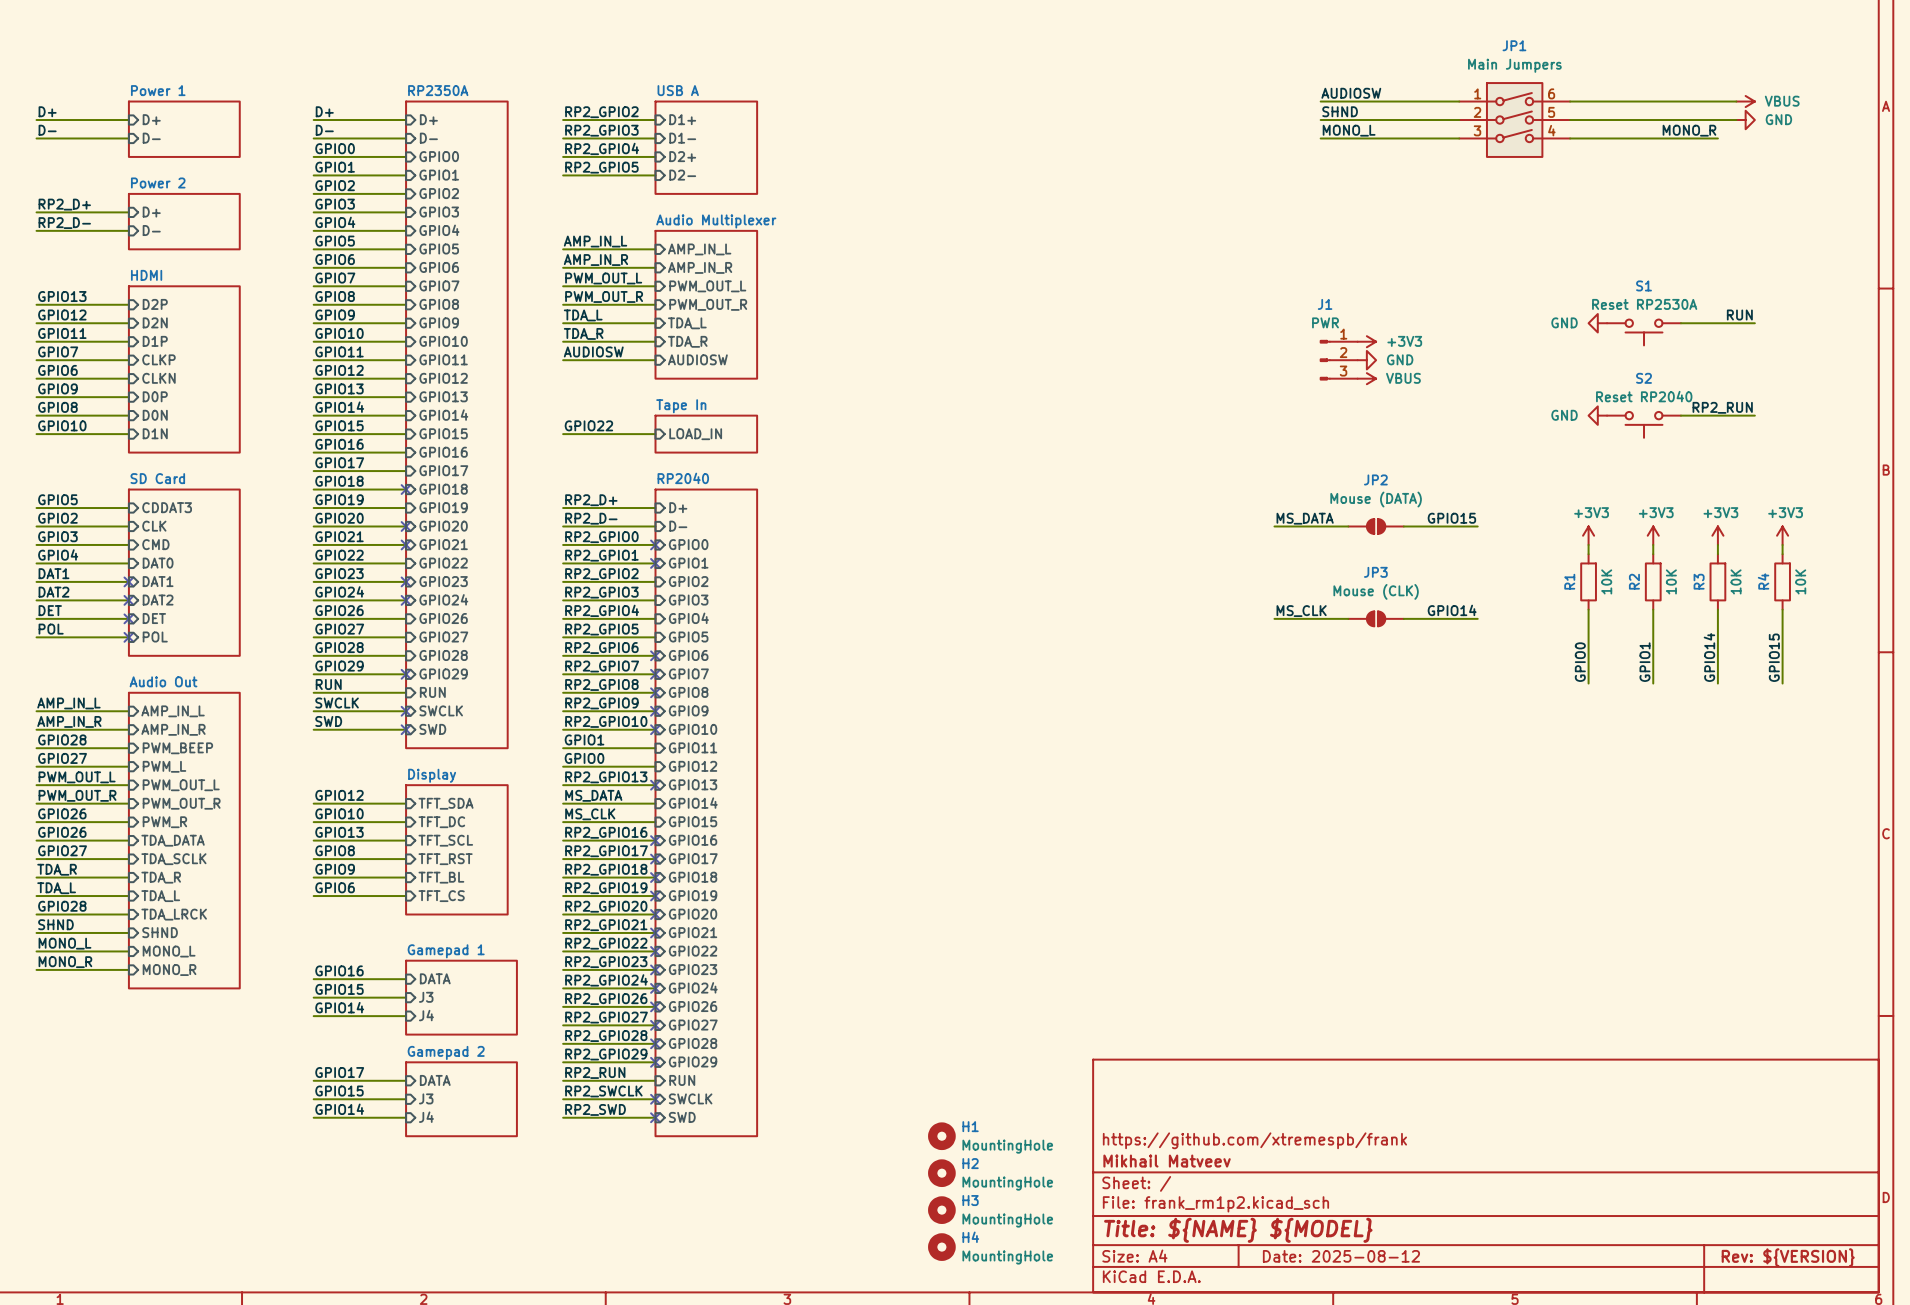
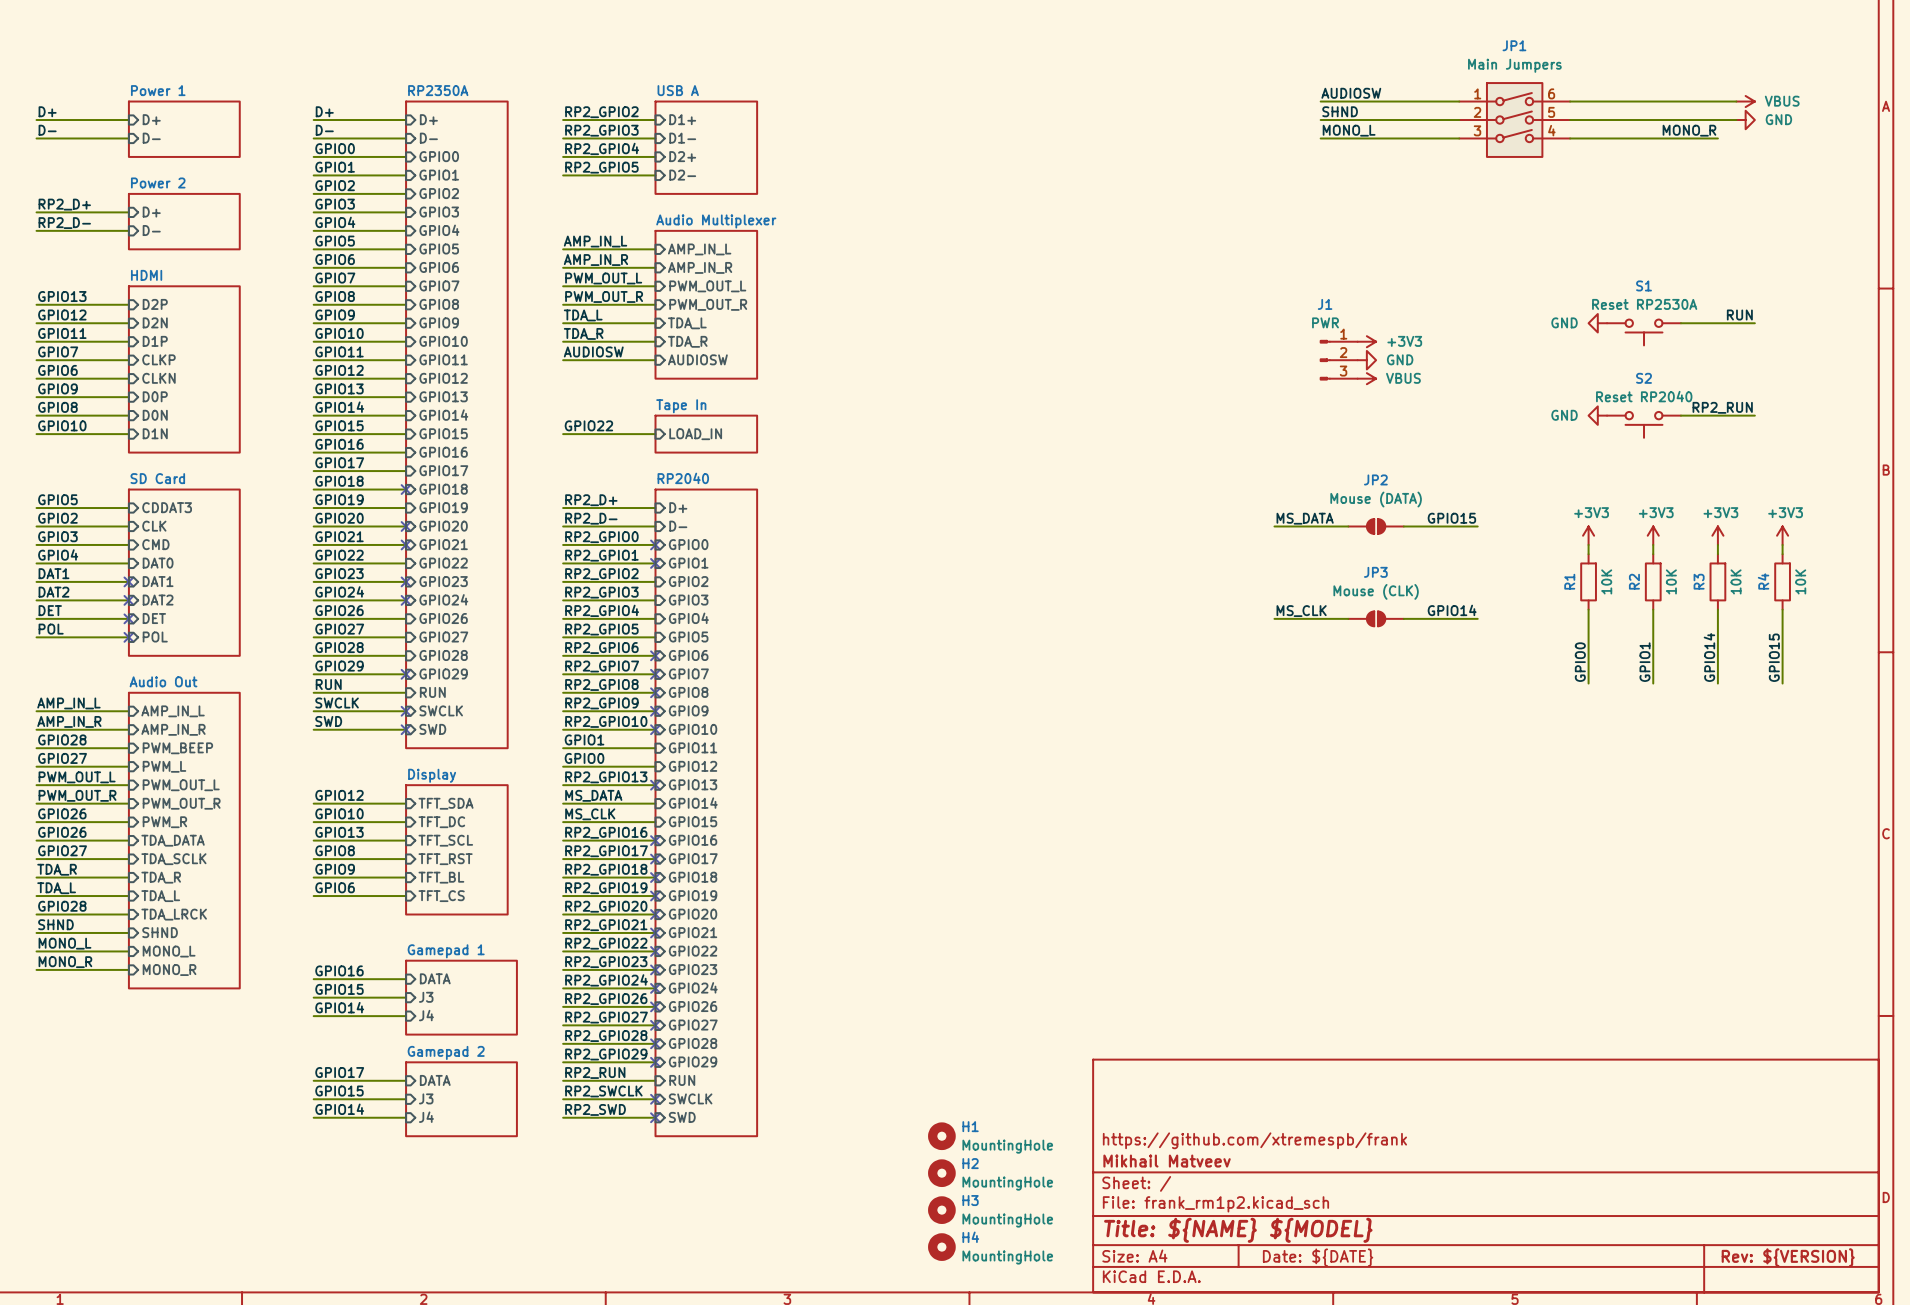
title block: Date: 2025-08-12 (1341, 1256) -> Date: ${DATE} (1318, 1257)

